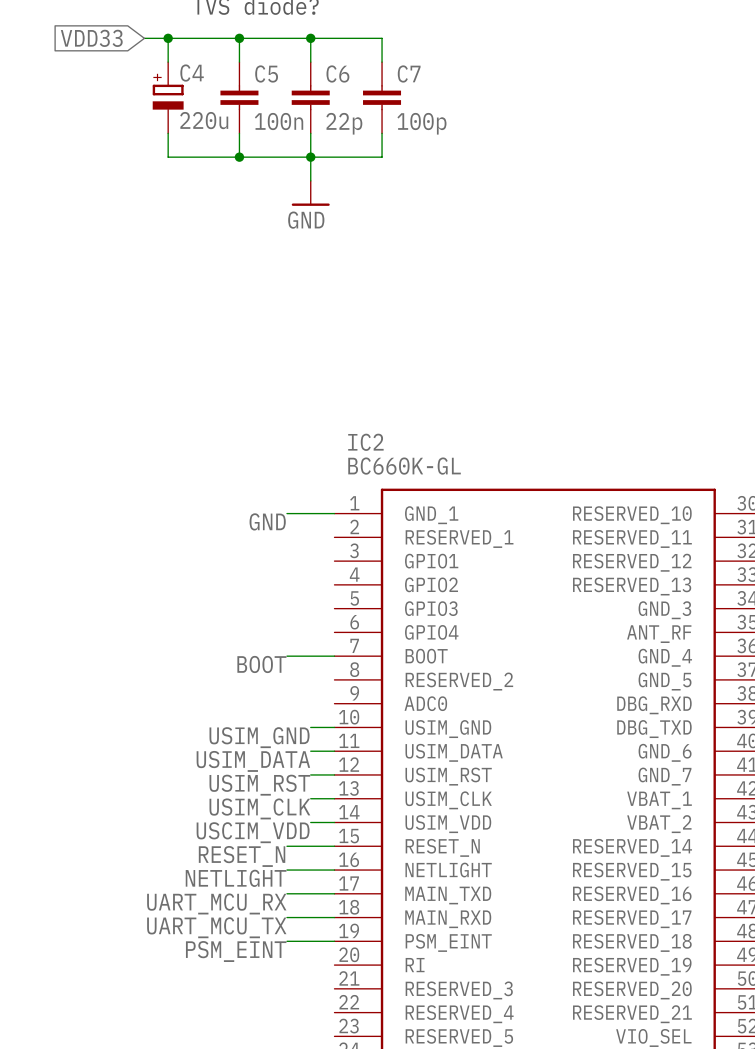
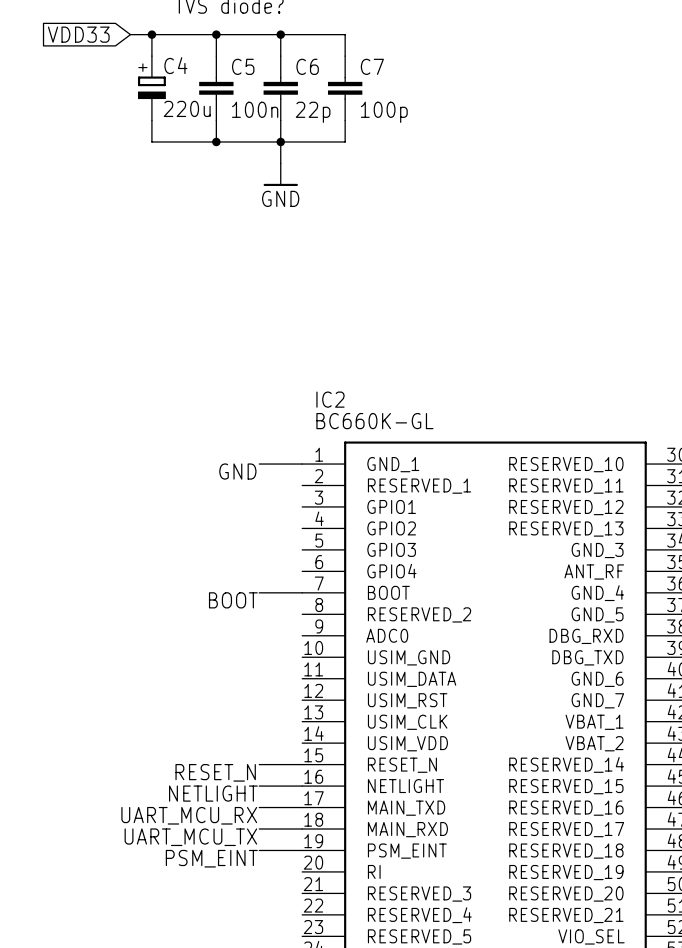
wire: (310, 727) (334, 727) -> none
label: USIM_GND (259, 737) -> none
wire: (310, 751) (334, 751) -> none
label: USIM_DATA (253, 761) -> none
wire: (310, 774) (334, 774) -> none
label: USIM_RST (259, 785) -> none
wire: (310, 798) (334, 798) -> none
label: USIM_CLK (259, 808) -> none
wire: (310, 822) (334, 822) -> none
label: USCIM_VDD (253, 832) -> none

